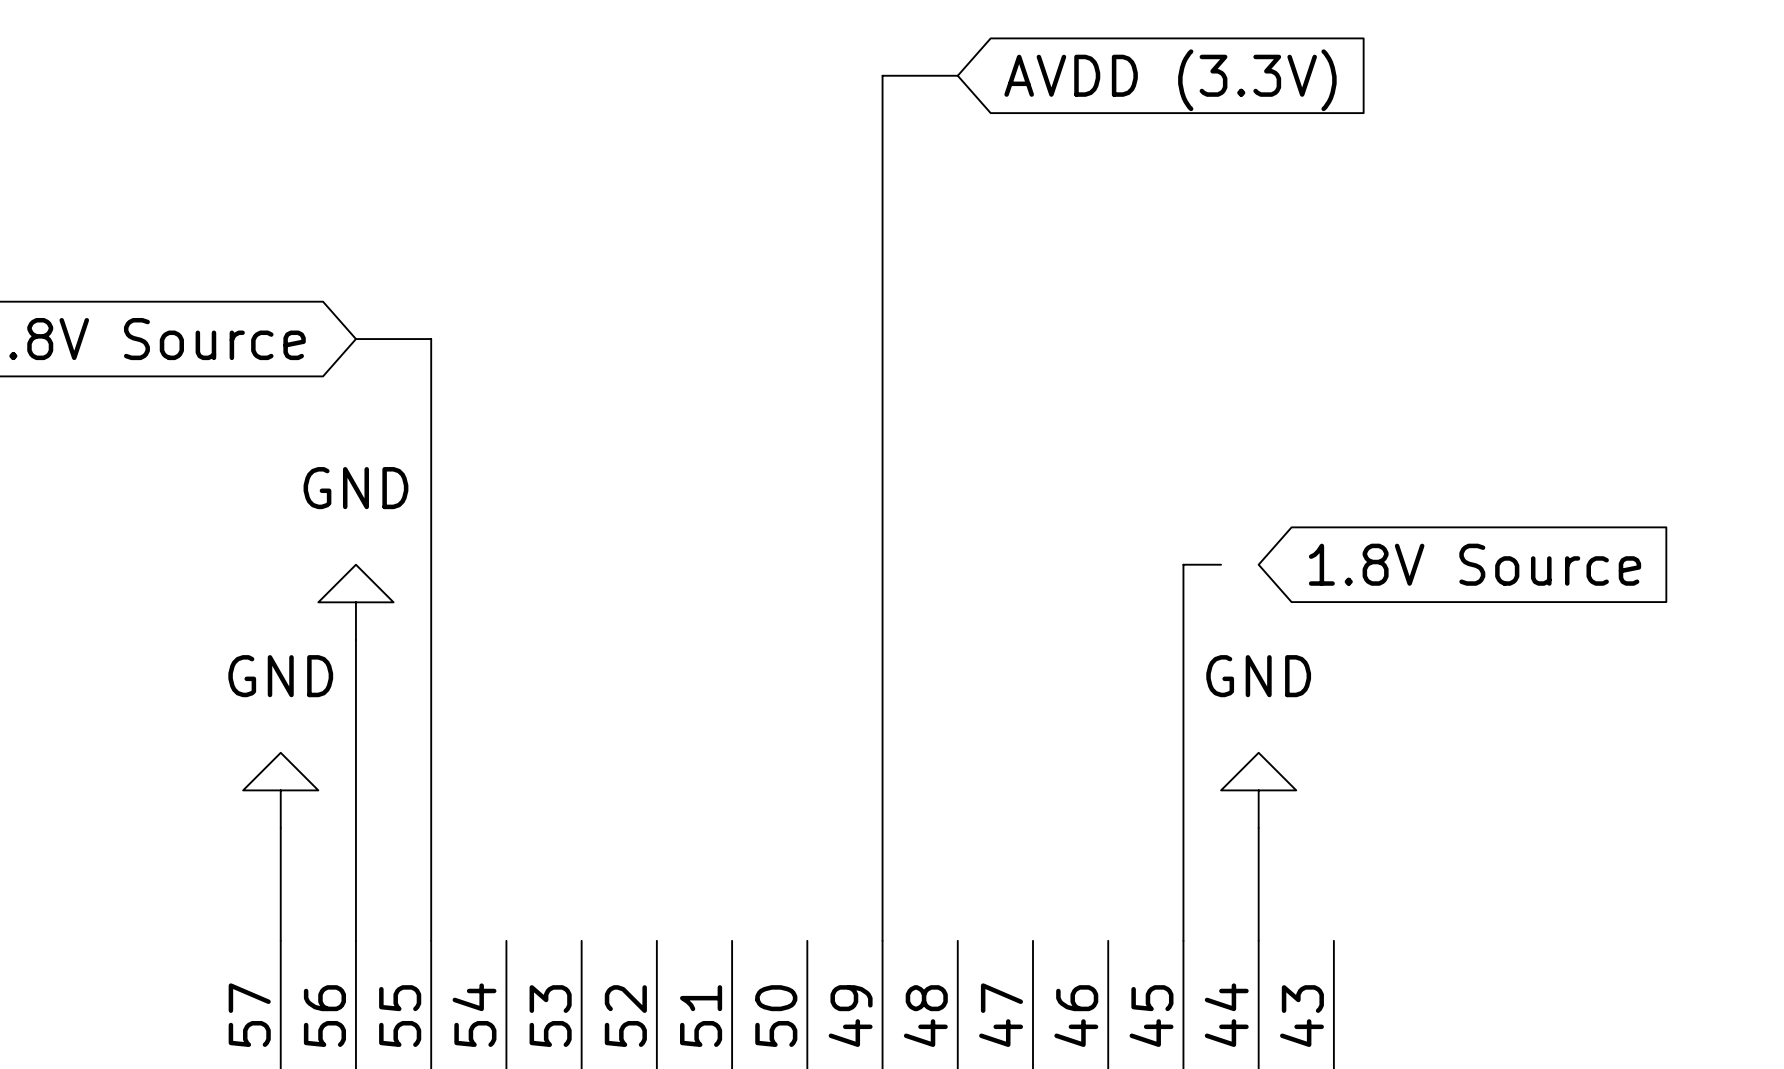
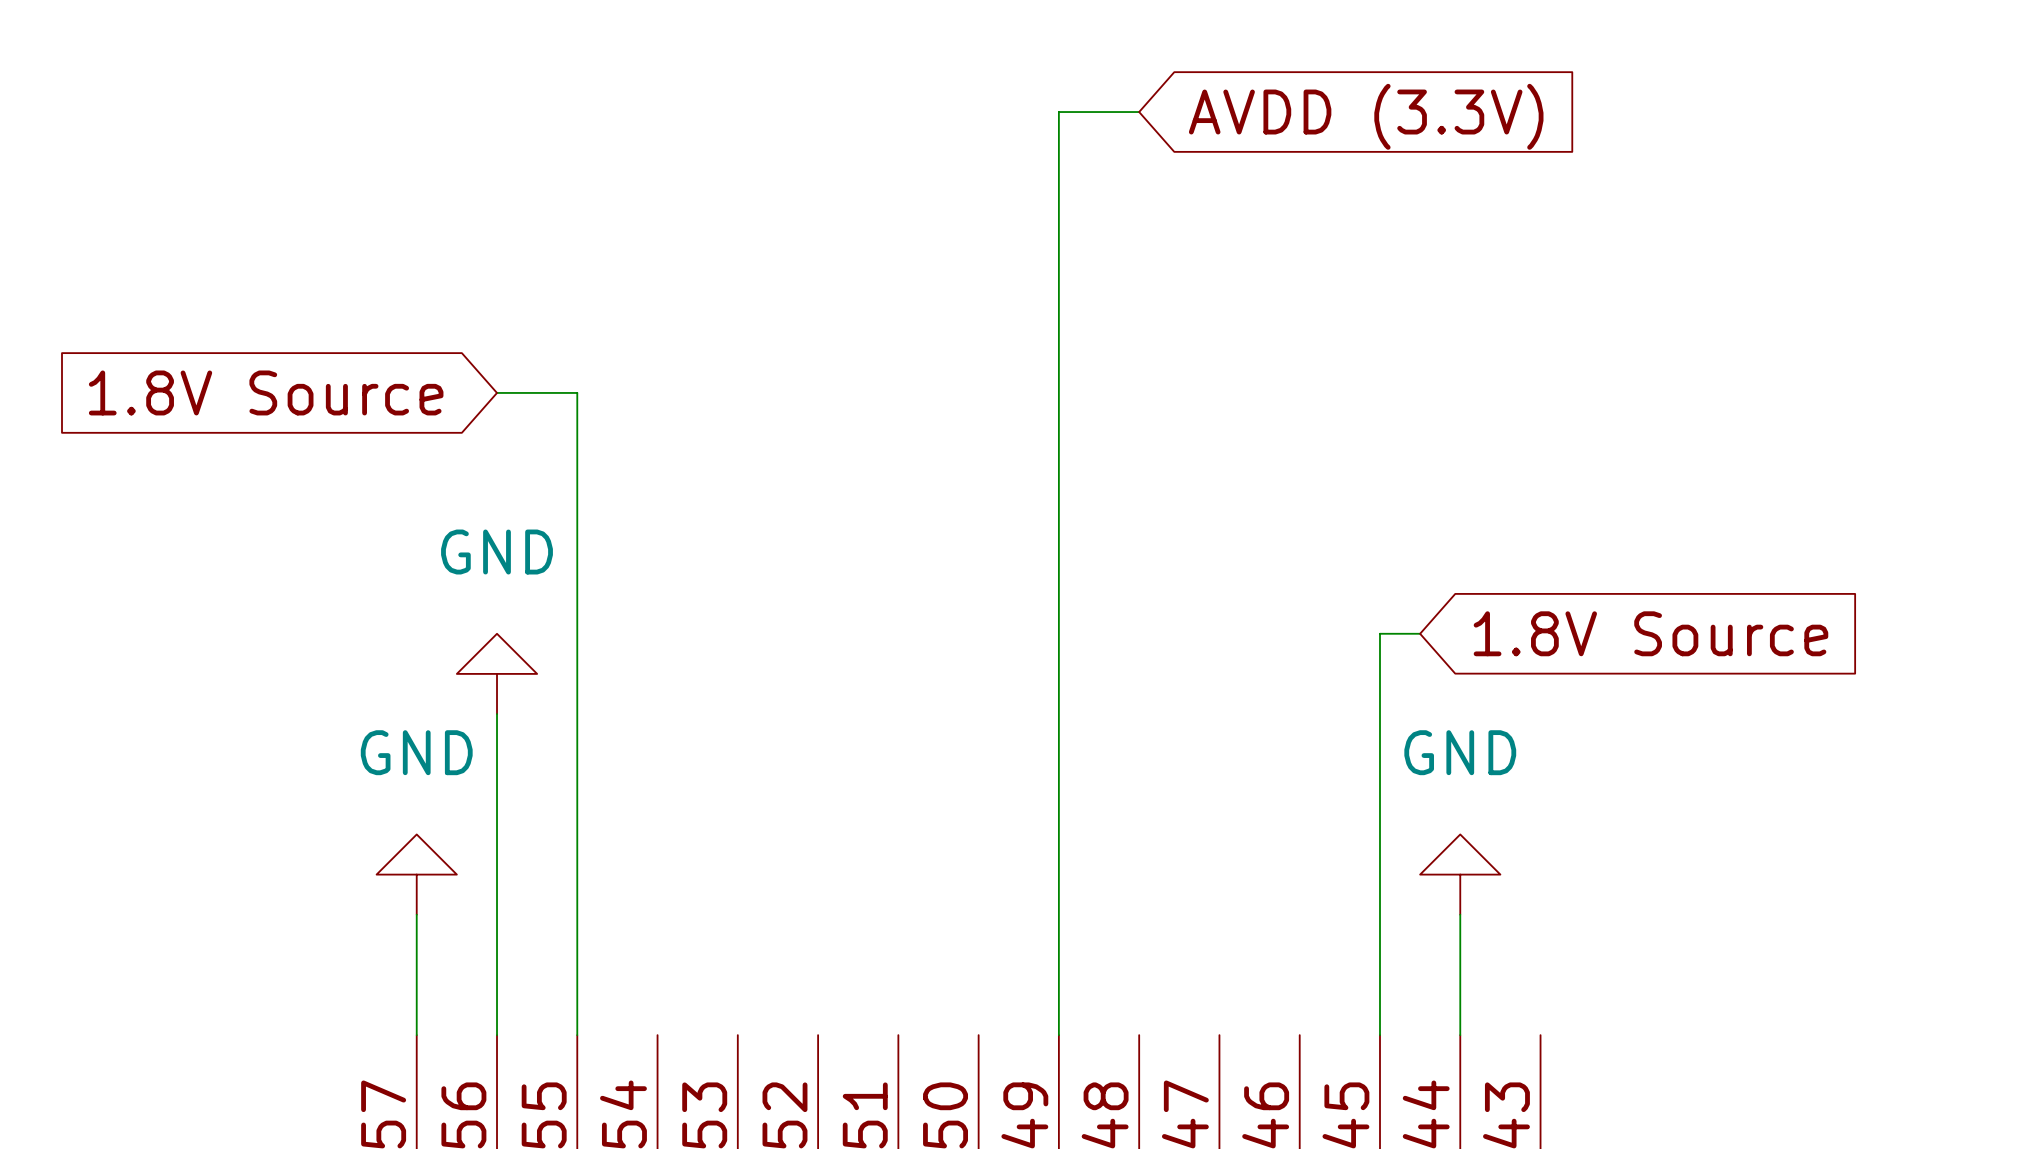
global label position: 1.8V Source (1475, 564) -> 1.8V Source (1650, 633)

